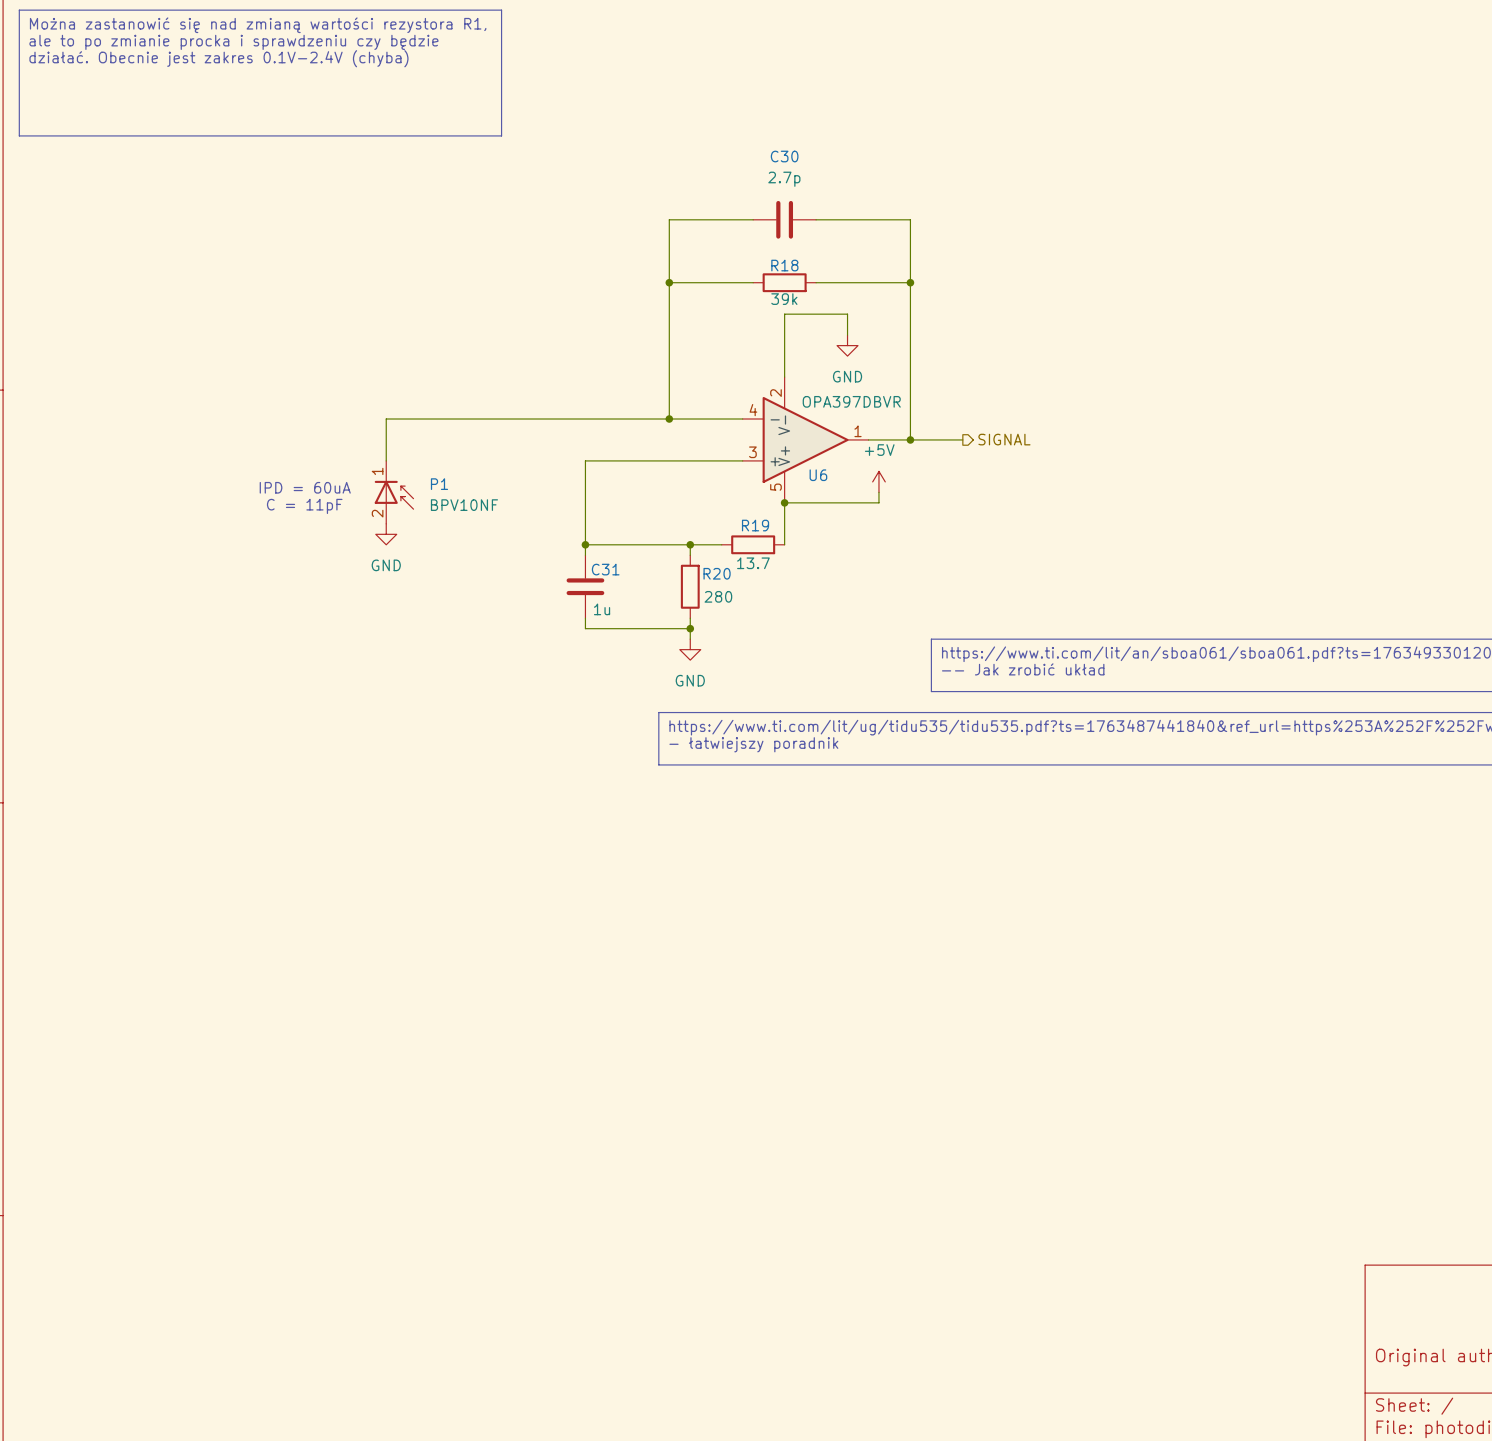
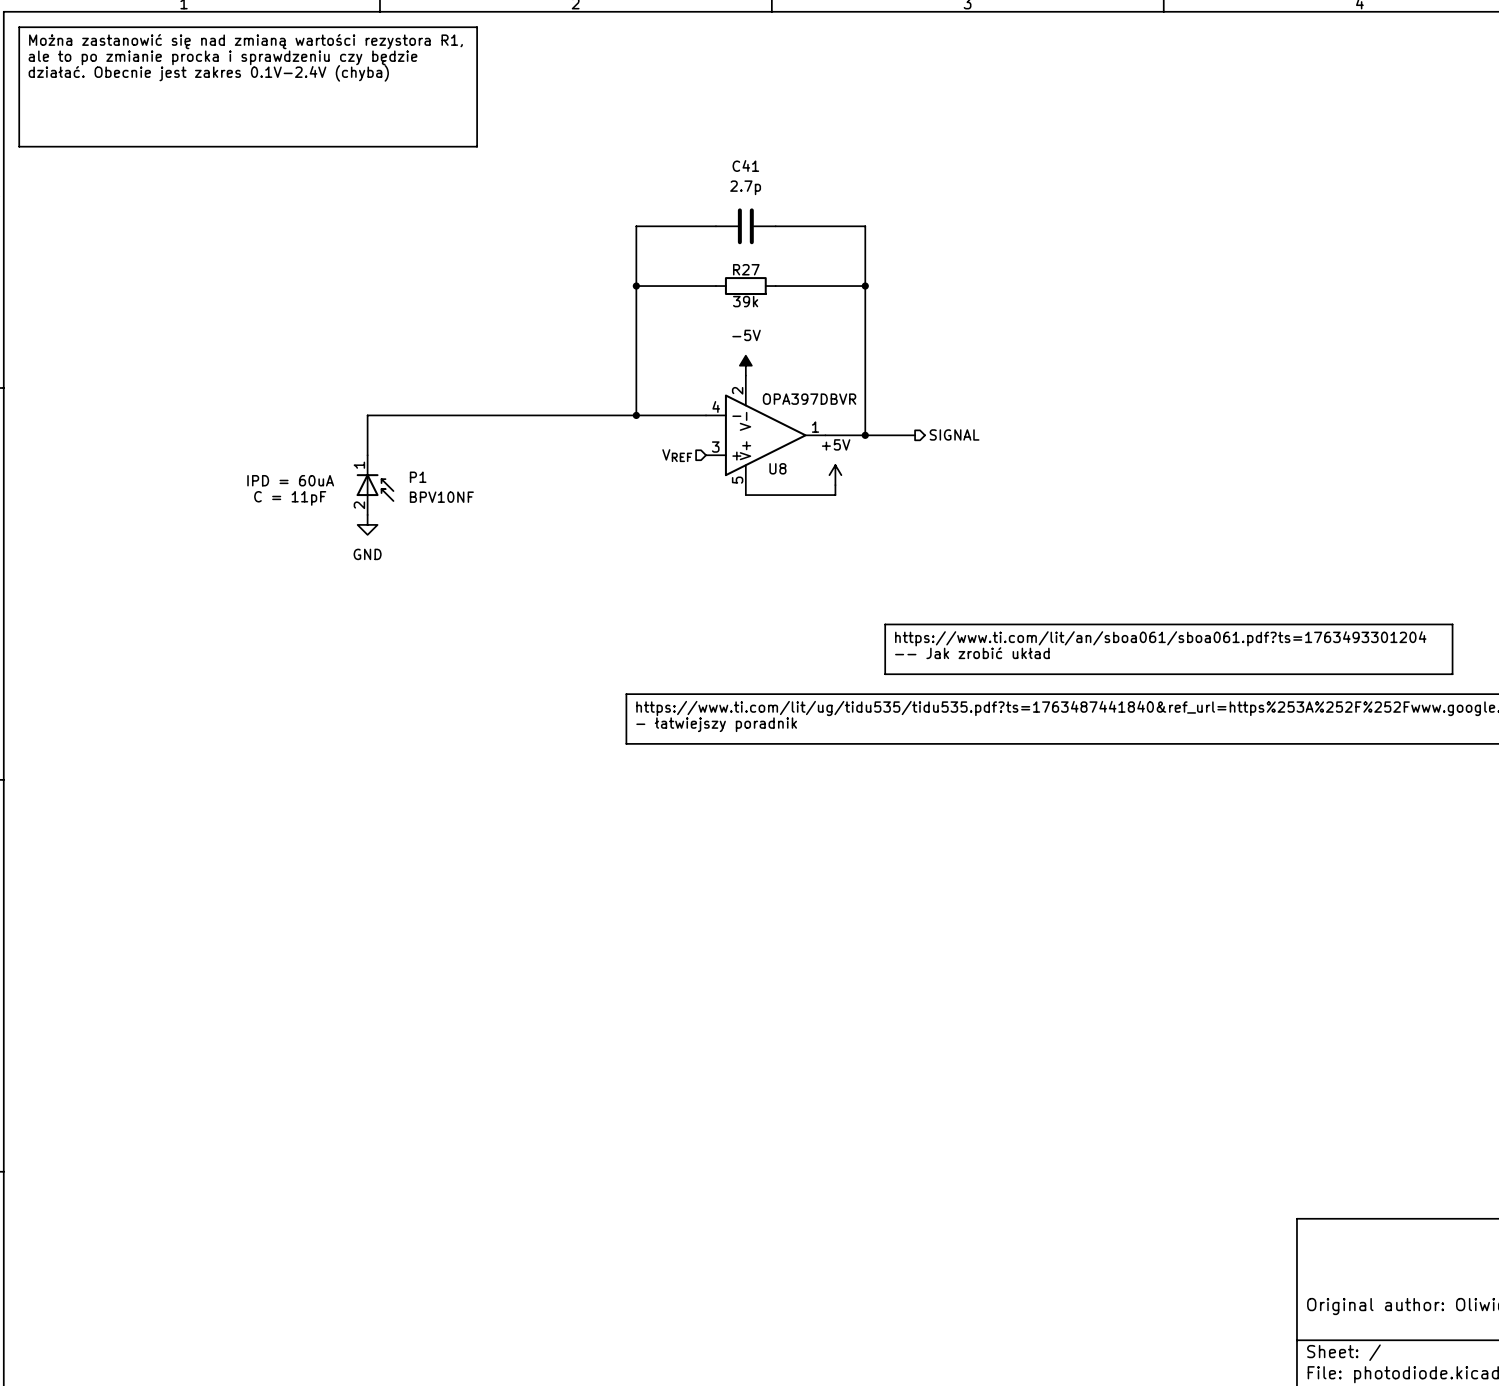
C30 name: C30 (784, 156) -> C41 (745, 165)
R18 name: R18 (784, 265) -> R27 (746, 269)
wire: (847, 335) (847, 314) (784, 314) (784, 377) -> none
power symbol: GND (847, 345) -> none
power symbol: none -> -5V (745, 365)
wire: (742, 460) (585, 460) (585, 555) -> none
hierarchical label: none -> VREF (677, 455)
U6 name: U6 (818, 475) -> U8 (777, 468)
wire: (784, 502) (784, 544) -> none
junction: (784, 502) -> none
wire: (585, 544) (721, 544) -> none
junction: (585, 544) -> none
wire: (690, 544) (690, 555) -> none
junction: (690, 544) -> none
R19: 13.7 (753, 544) -> none
C31: 1u (585, 586) -> none
R20: 280 (690, 586) -> none
wire: (585, 618) (585, 628) (690, 628) -> none
wire: (690, 618) (690, 639) -> none
junction: (690, 628) -> none
power symbol: GND (690, 649) -> none

